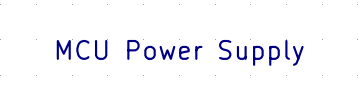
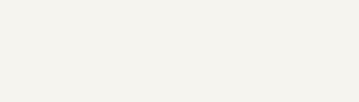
text: MCU Power Supply (180, 52) -> none

